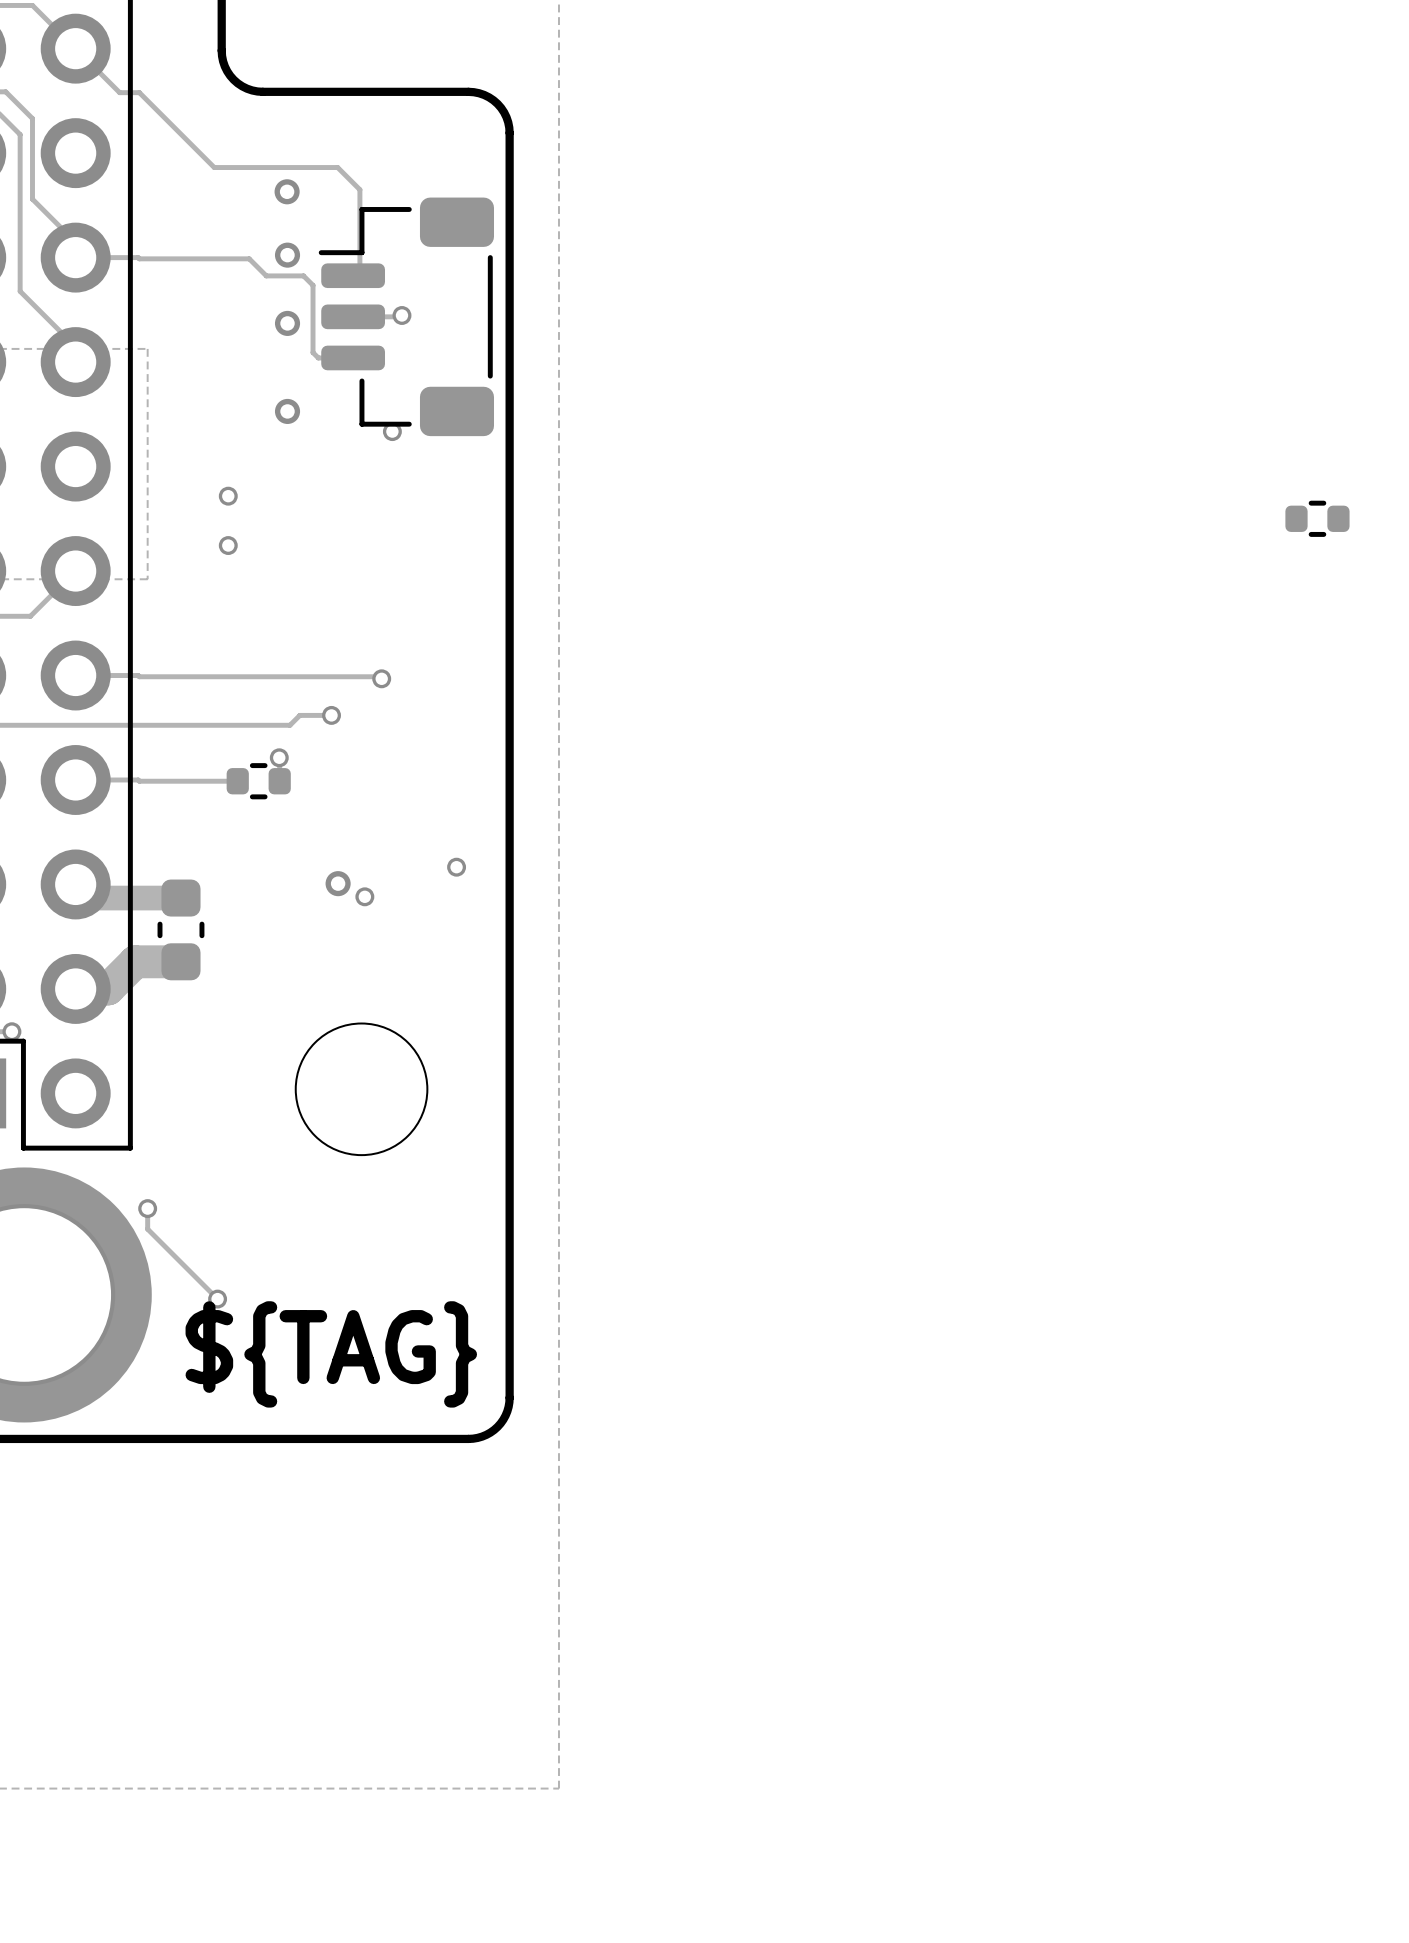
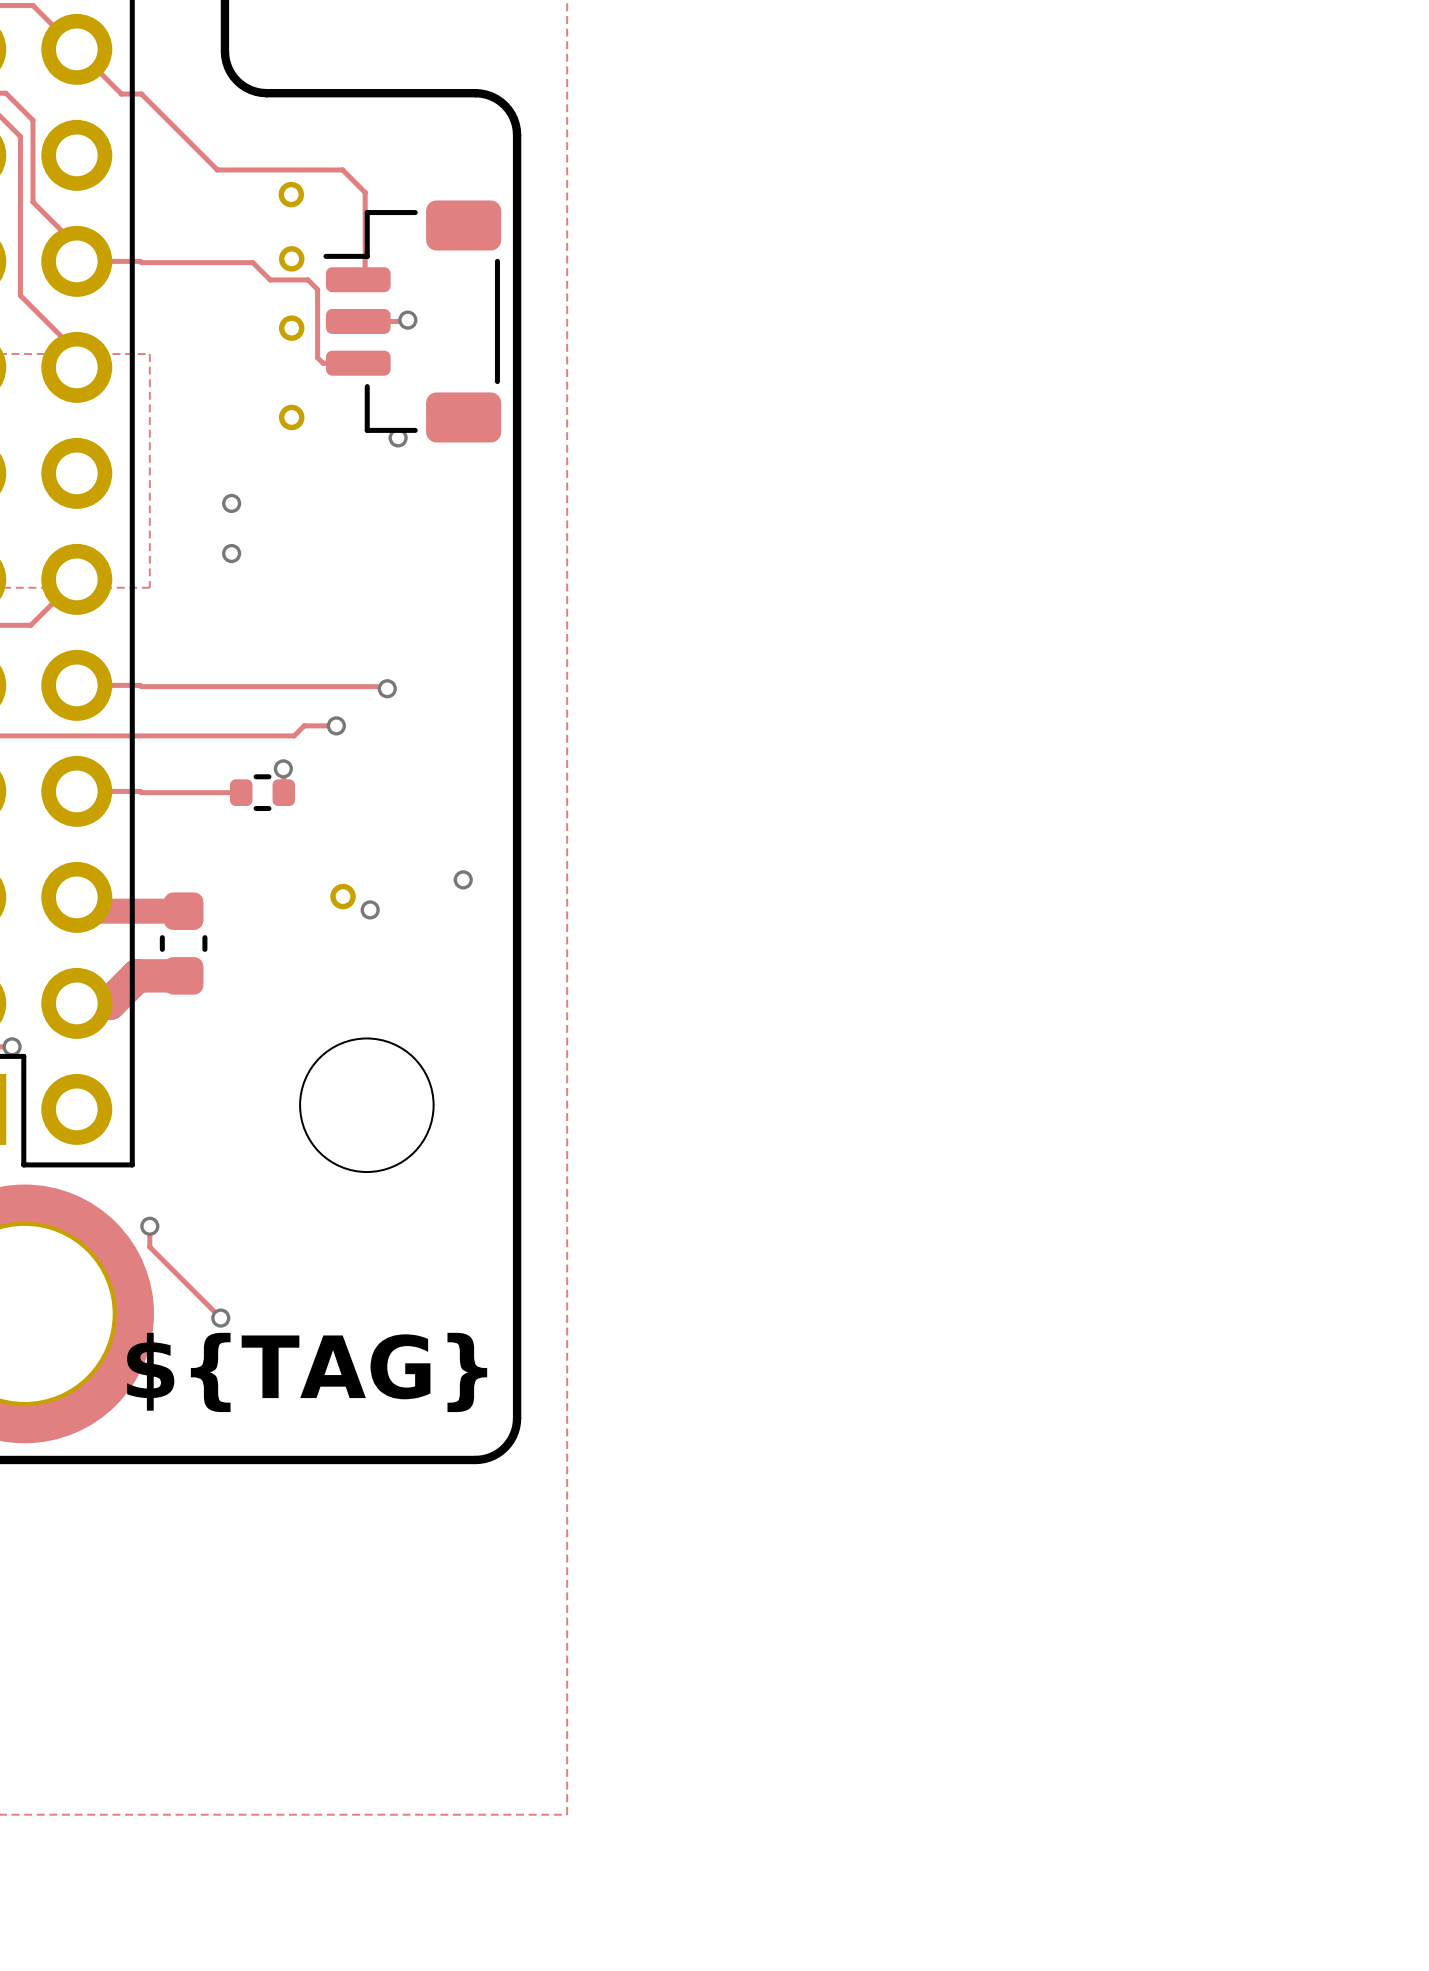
part: (1317, 518) -> none

